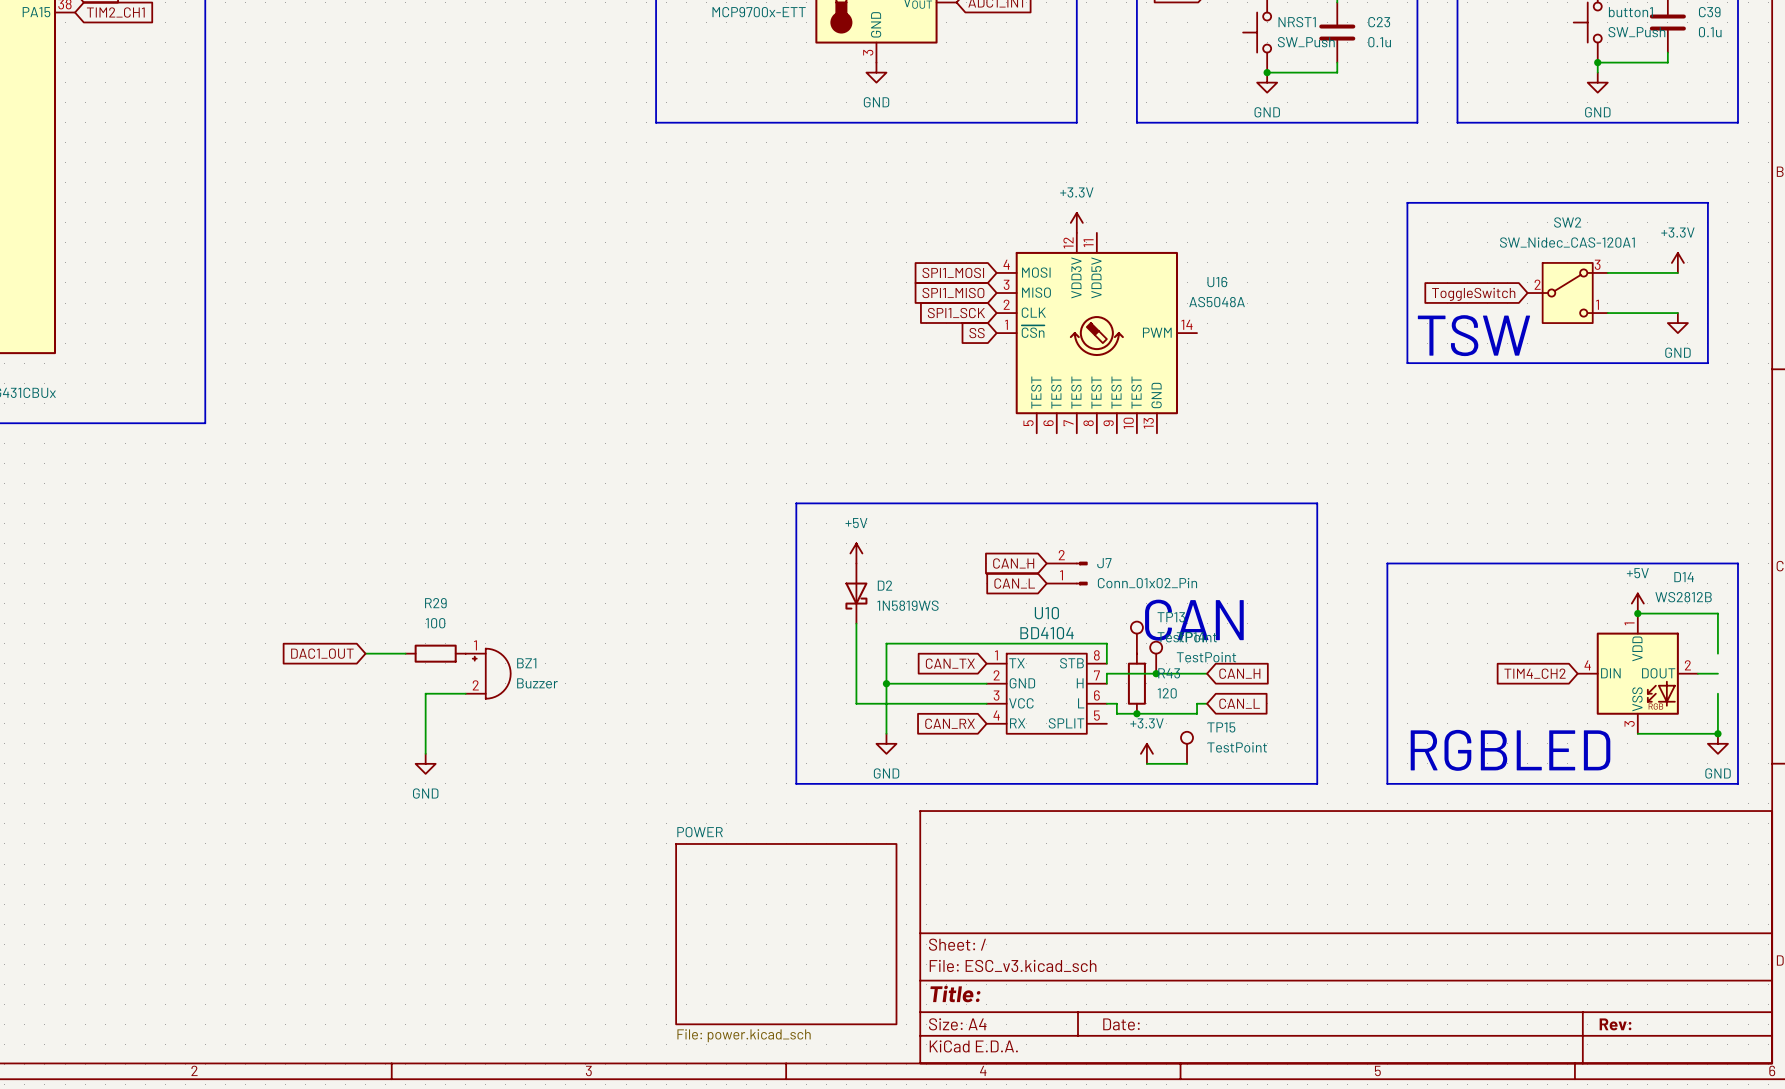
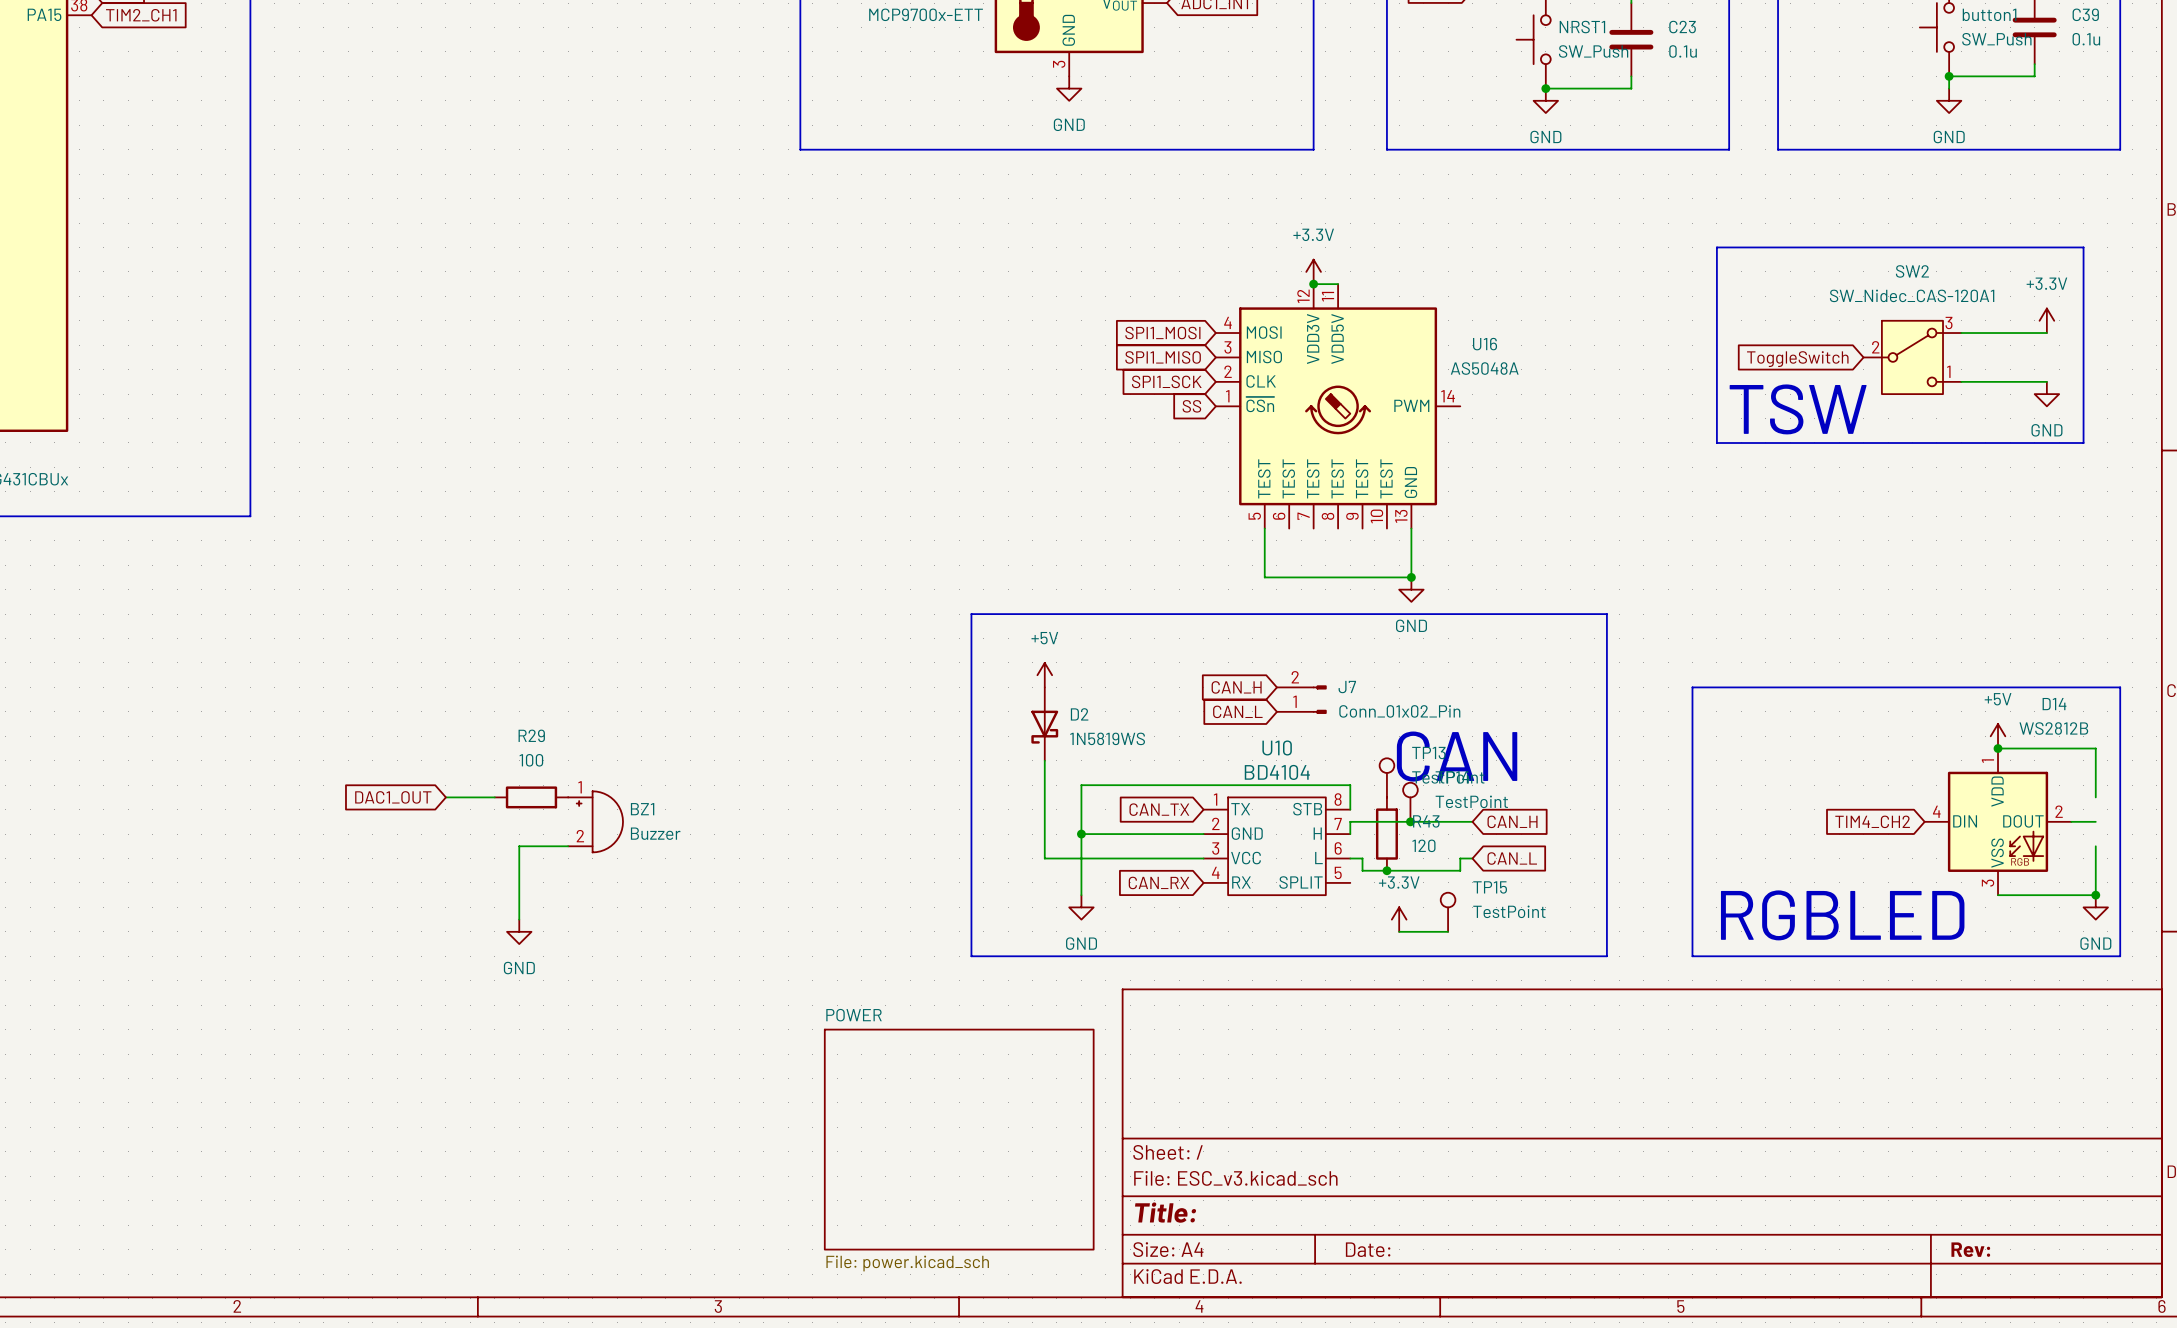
wire: none -> (1313, 284) (1338, 284)
junction: none -> (1313, 284)
wire: none -> (1264, 528) (1264, 577) (1411, 577) (1411, 528)
junction: none -> (1411, 577)
power symbol: none -> GND (1411, 589)

